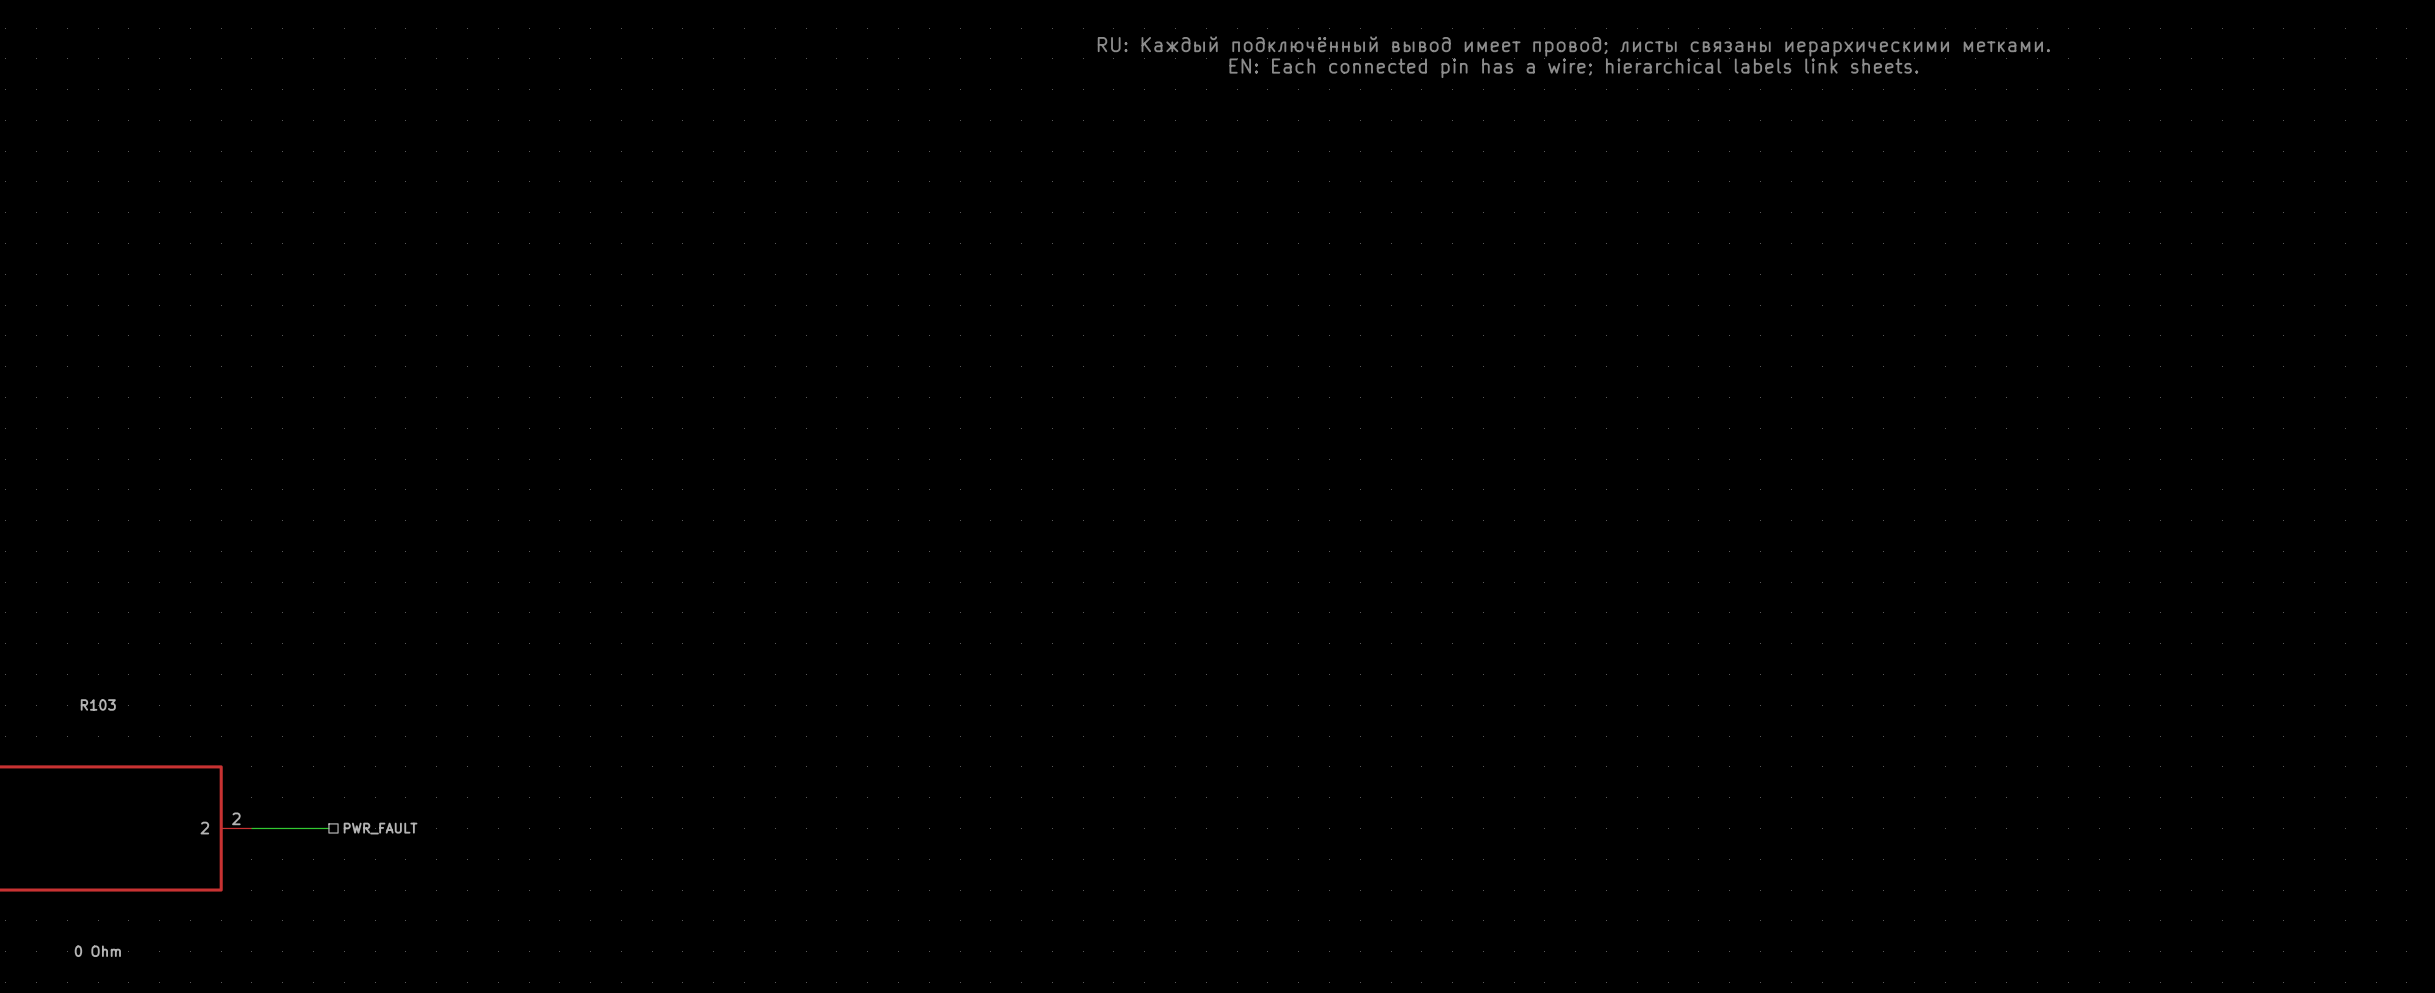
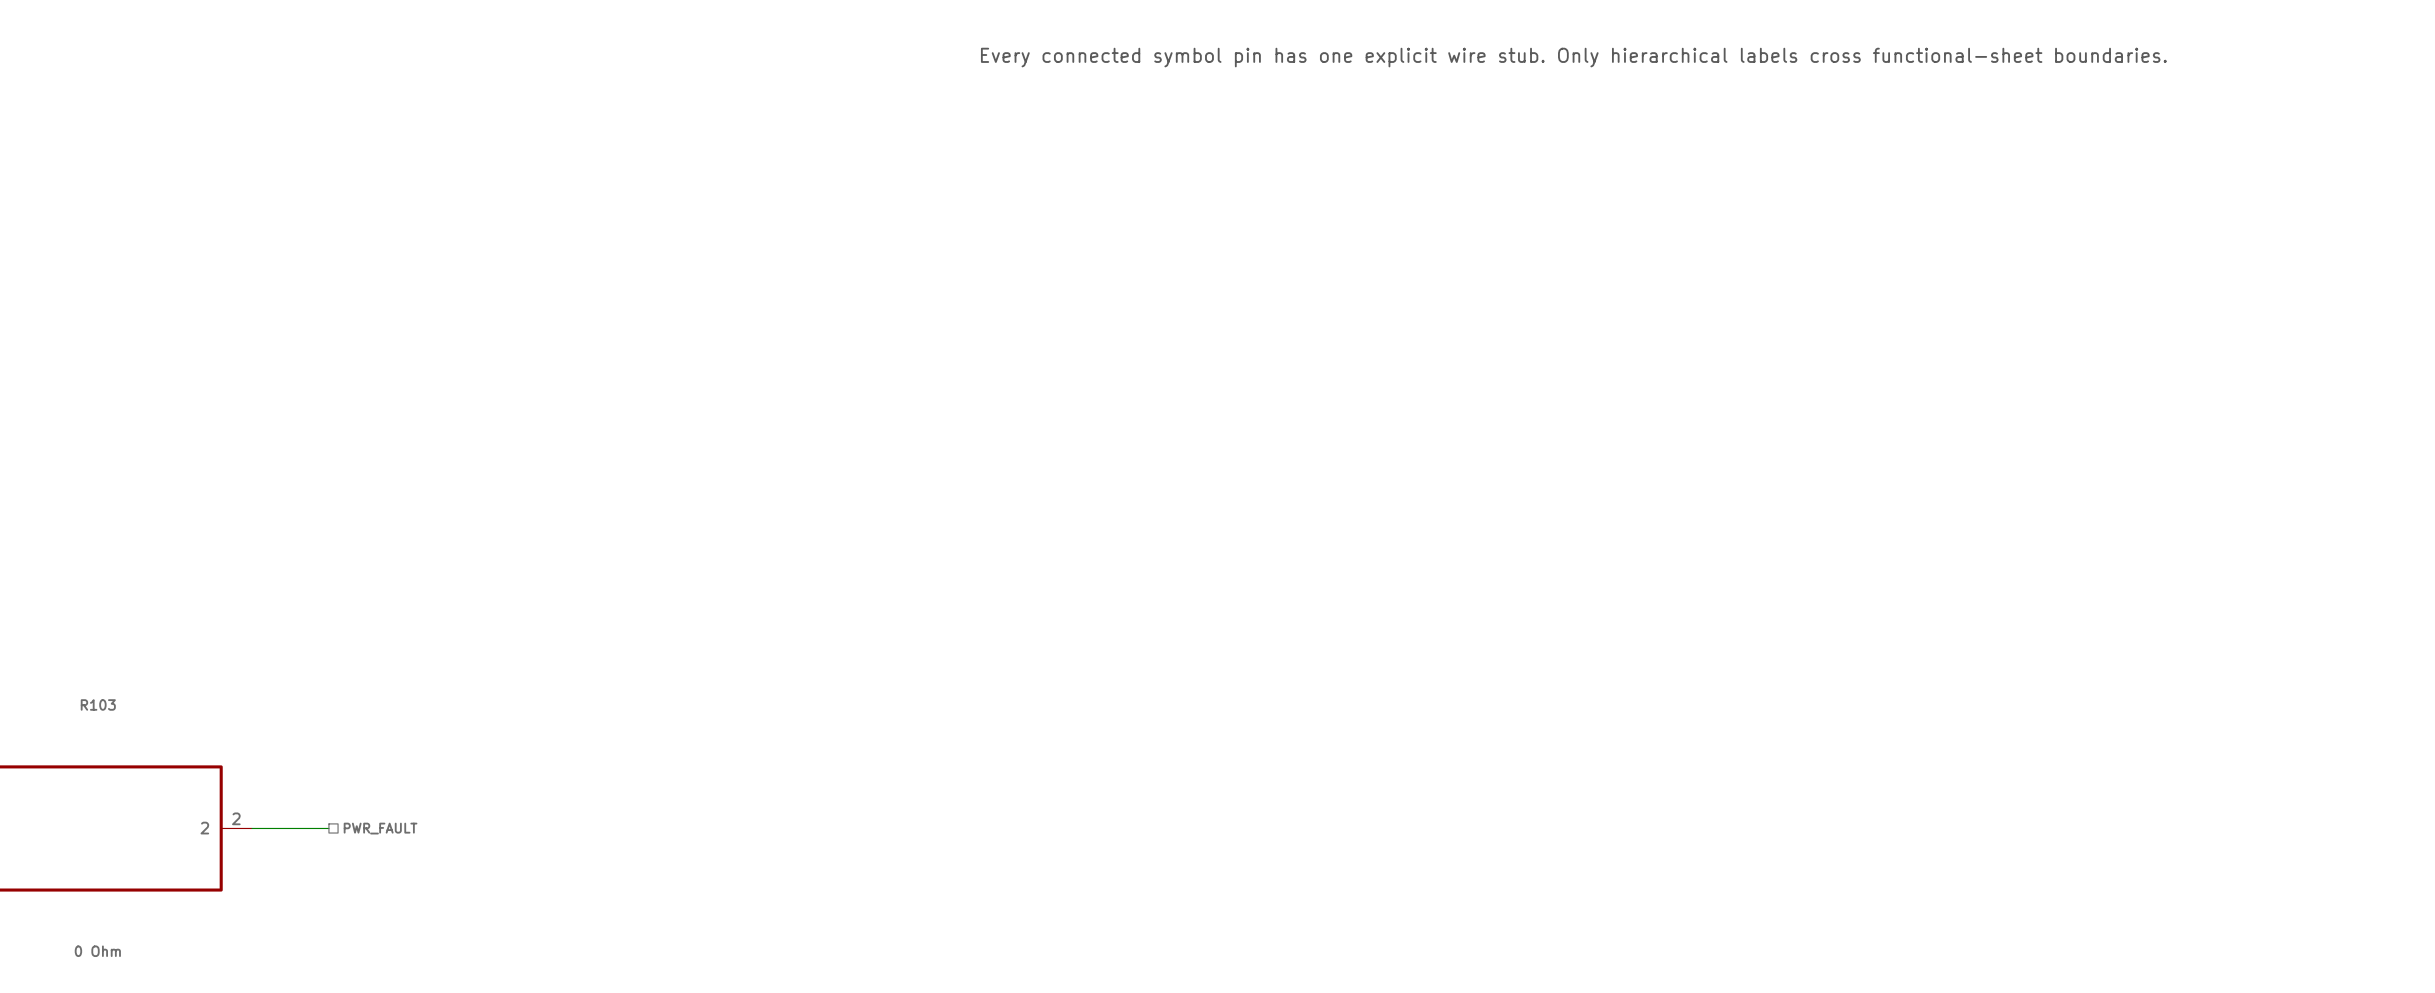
text: RU: Каждый подключённый вывод имеет провод; листы связаны иерархическими метками. (1573, 46) -> none
text: none -> Every connected symbol pin has one explicit wire stub. Only hierarchical labels cross functional-sheet boundaries. (1573, 57)
text: EN: Each connected pin has a wire; hierarchical labels link sheets. (1573, 68) -> none

